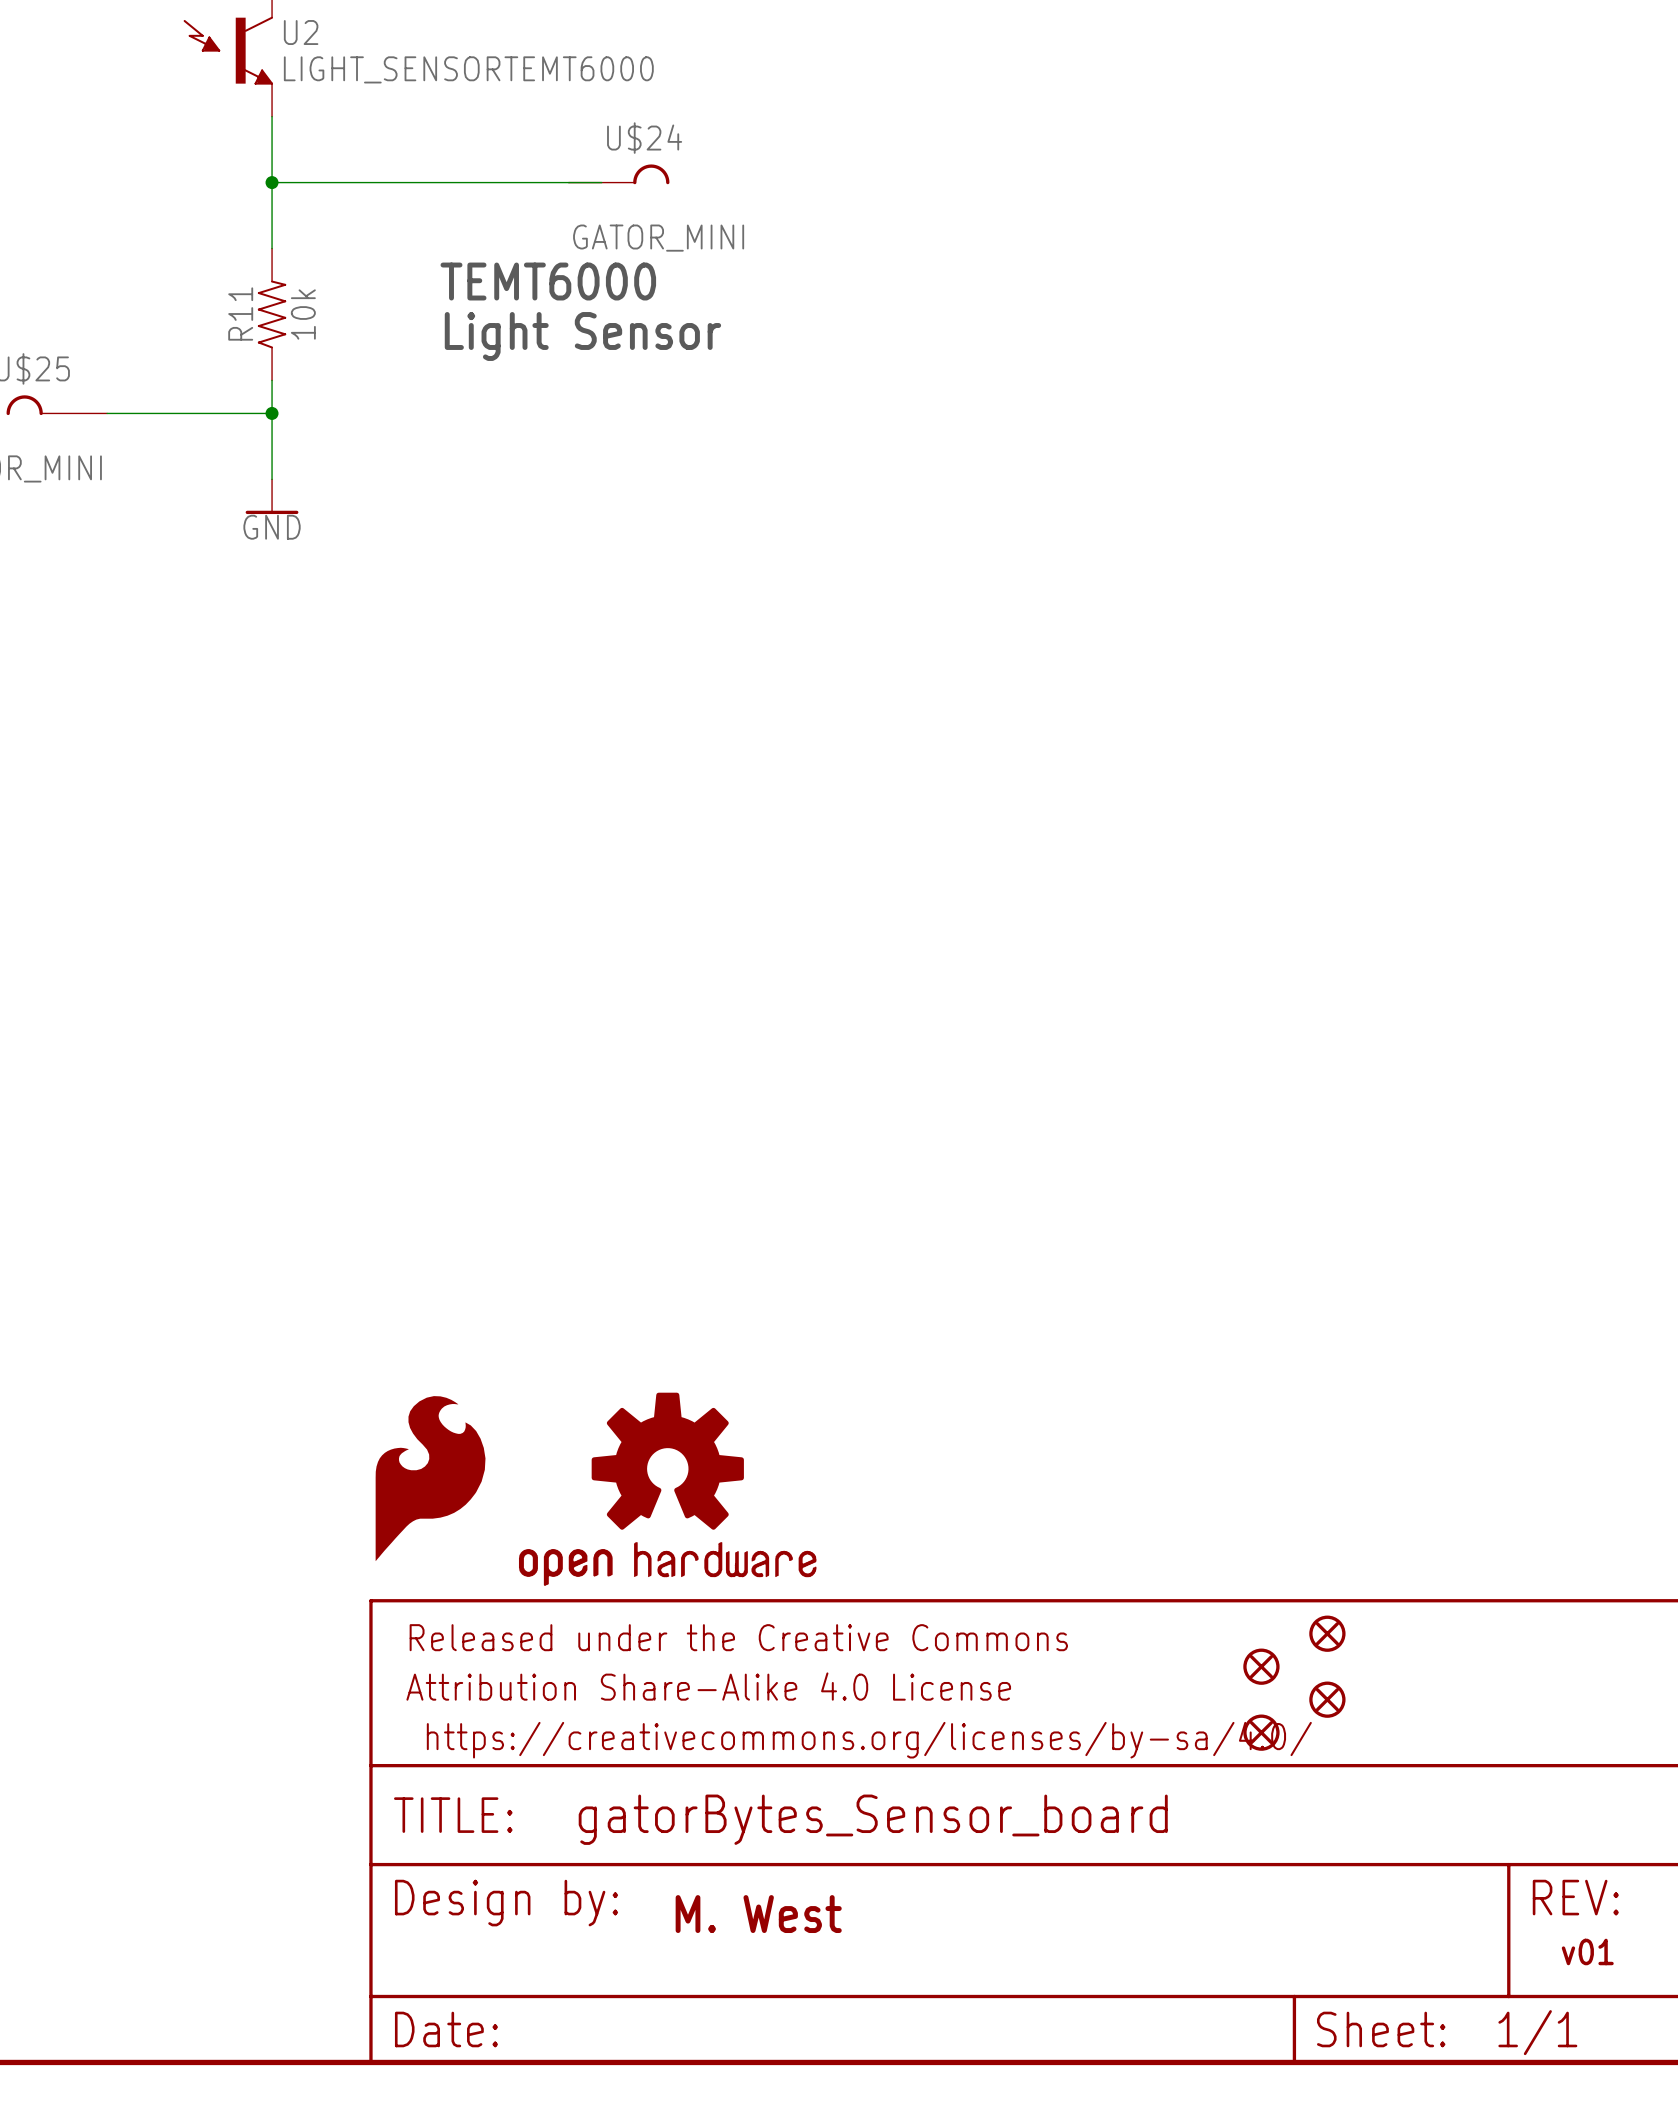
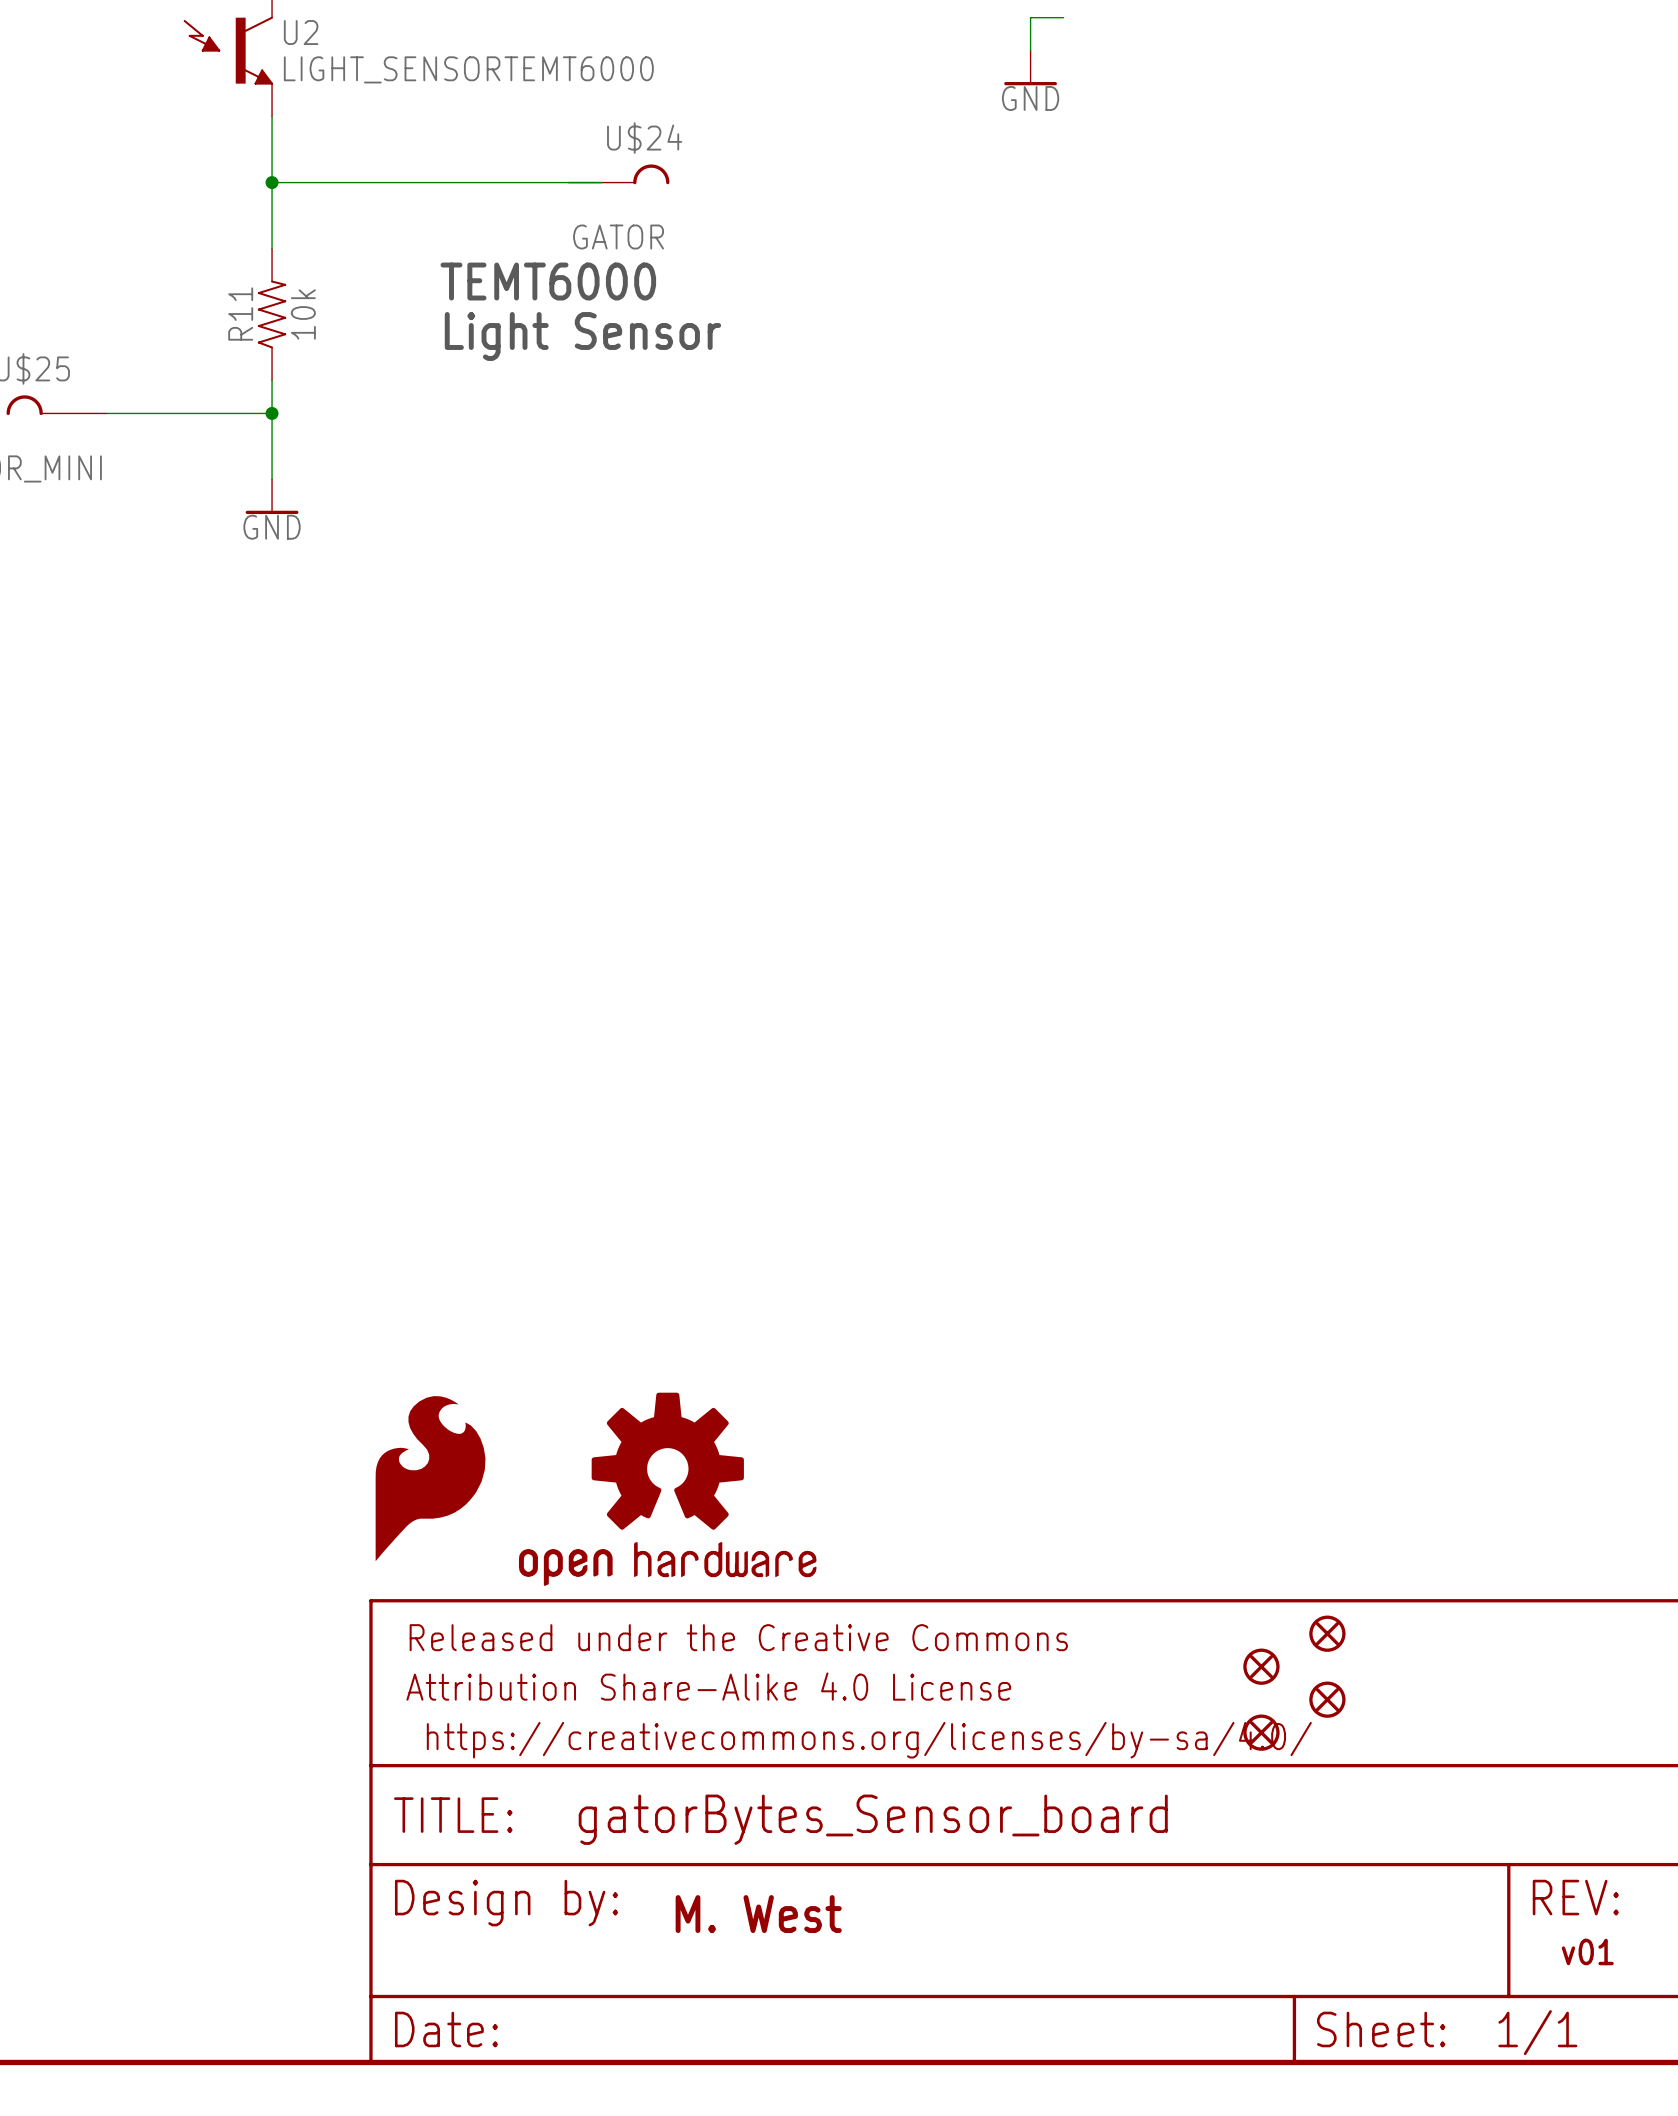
wire: none -> (1063, 17) (1030, 17) (1030, 50)
power symbol: none -> GND (1030, 67)
U$24 value: GATOR_MINI (658, 238) -> GATOR (618, 237)

